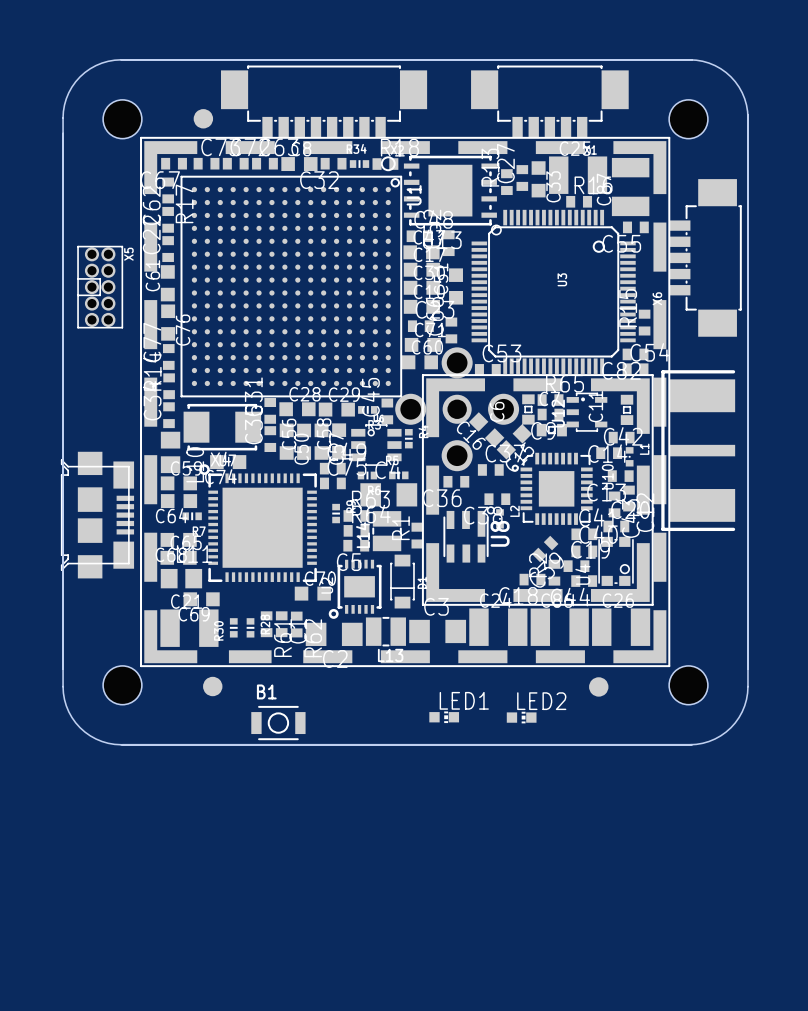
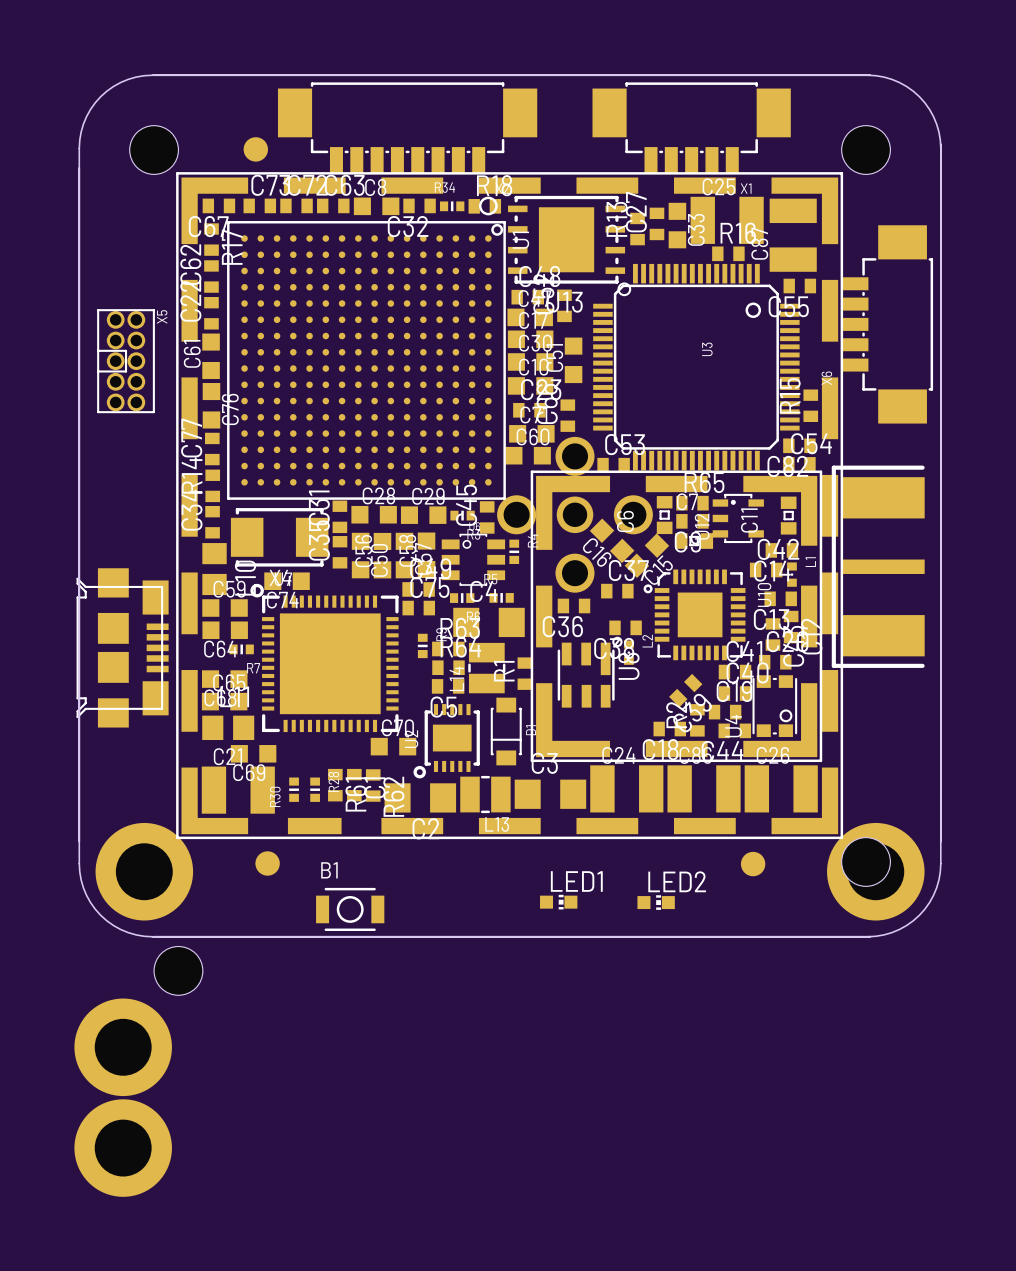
hole position: (122, 685) -> (178, 970)
part: none -> (144, 871)
part: none -> (875, 871)
part: none -> (123, 1047)
part: none -> (123, 1148)

